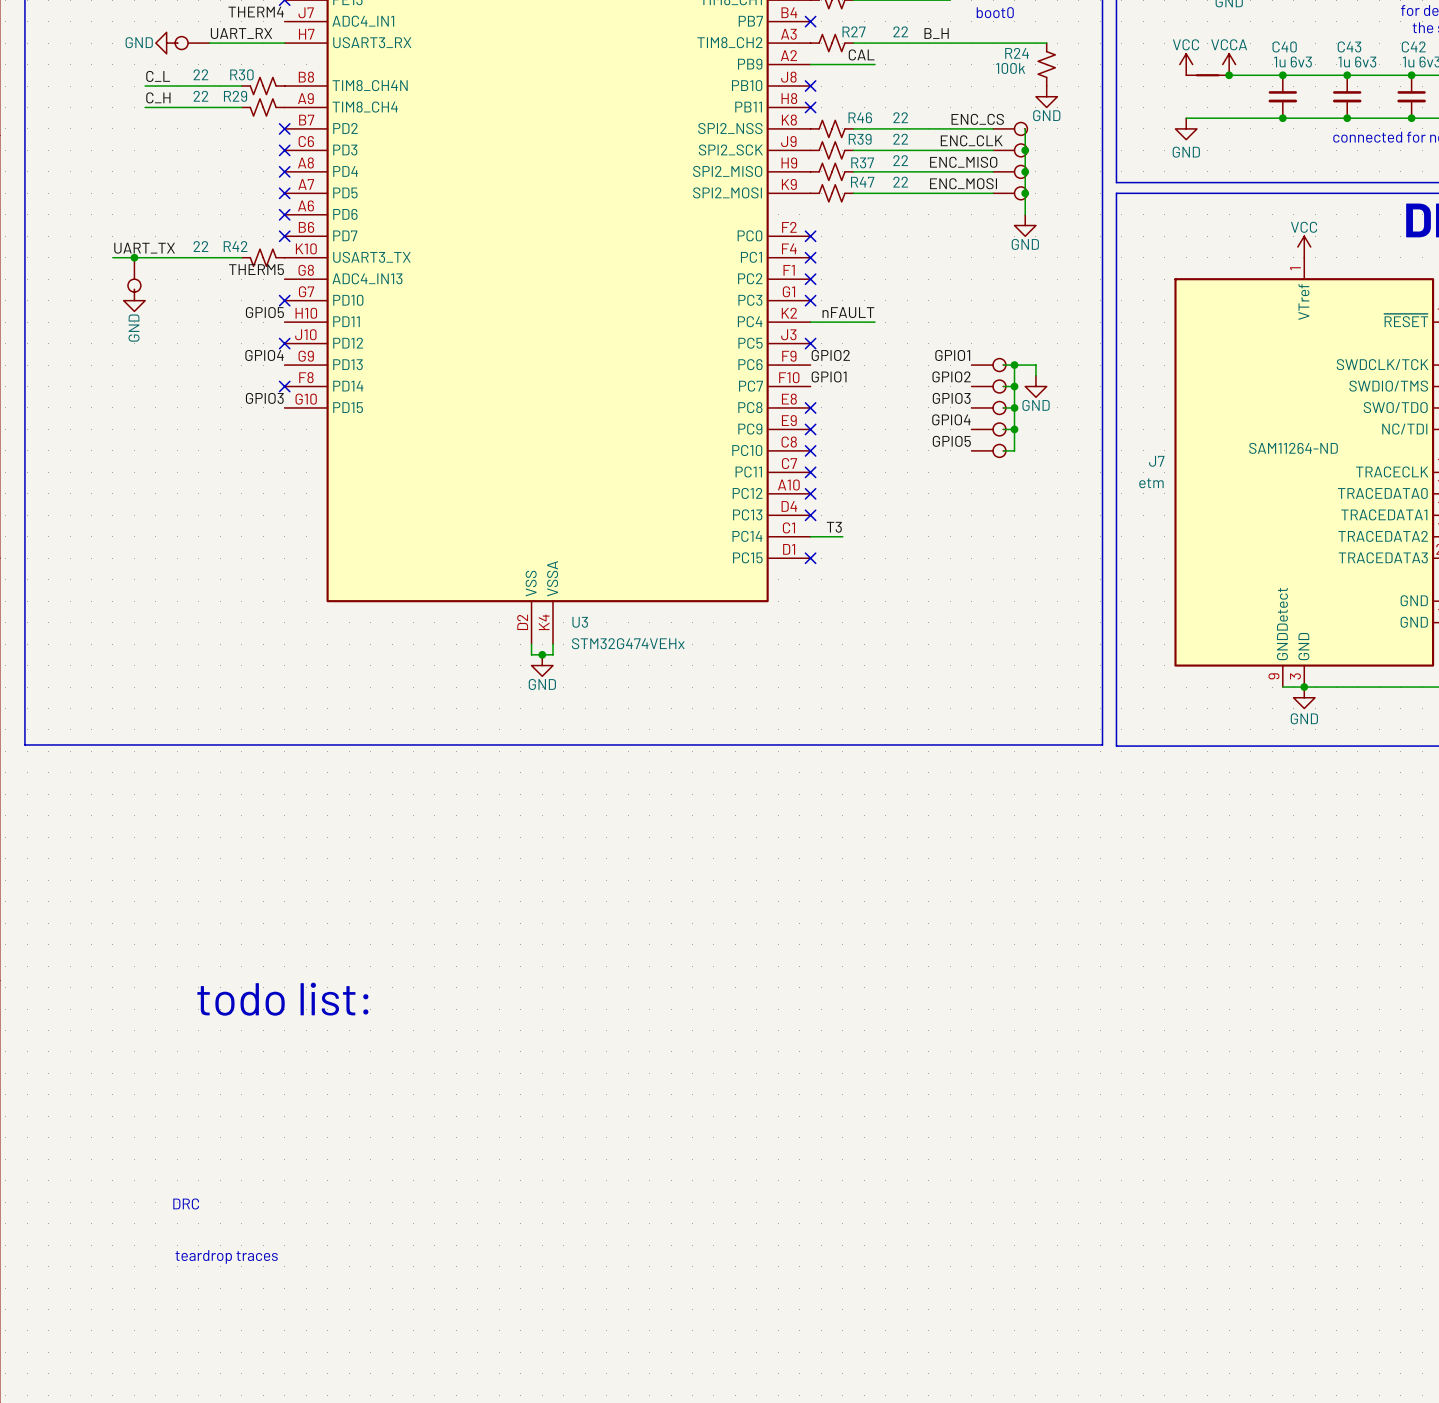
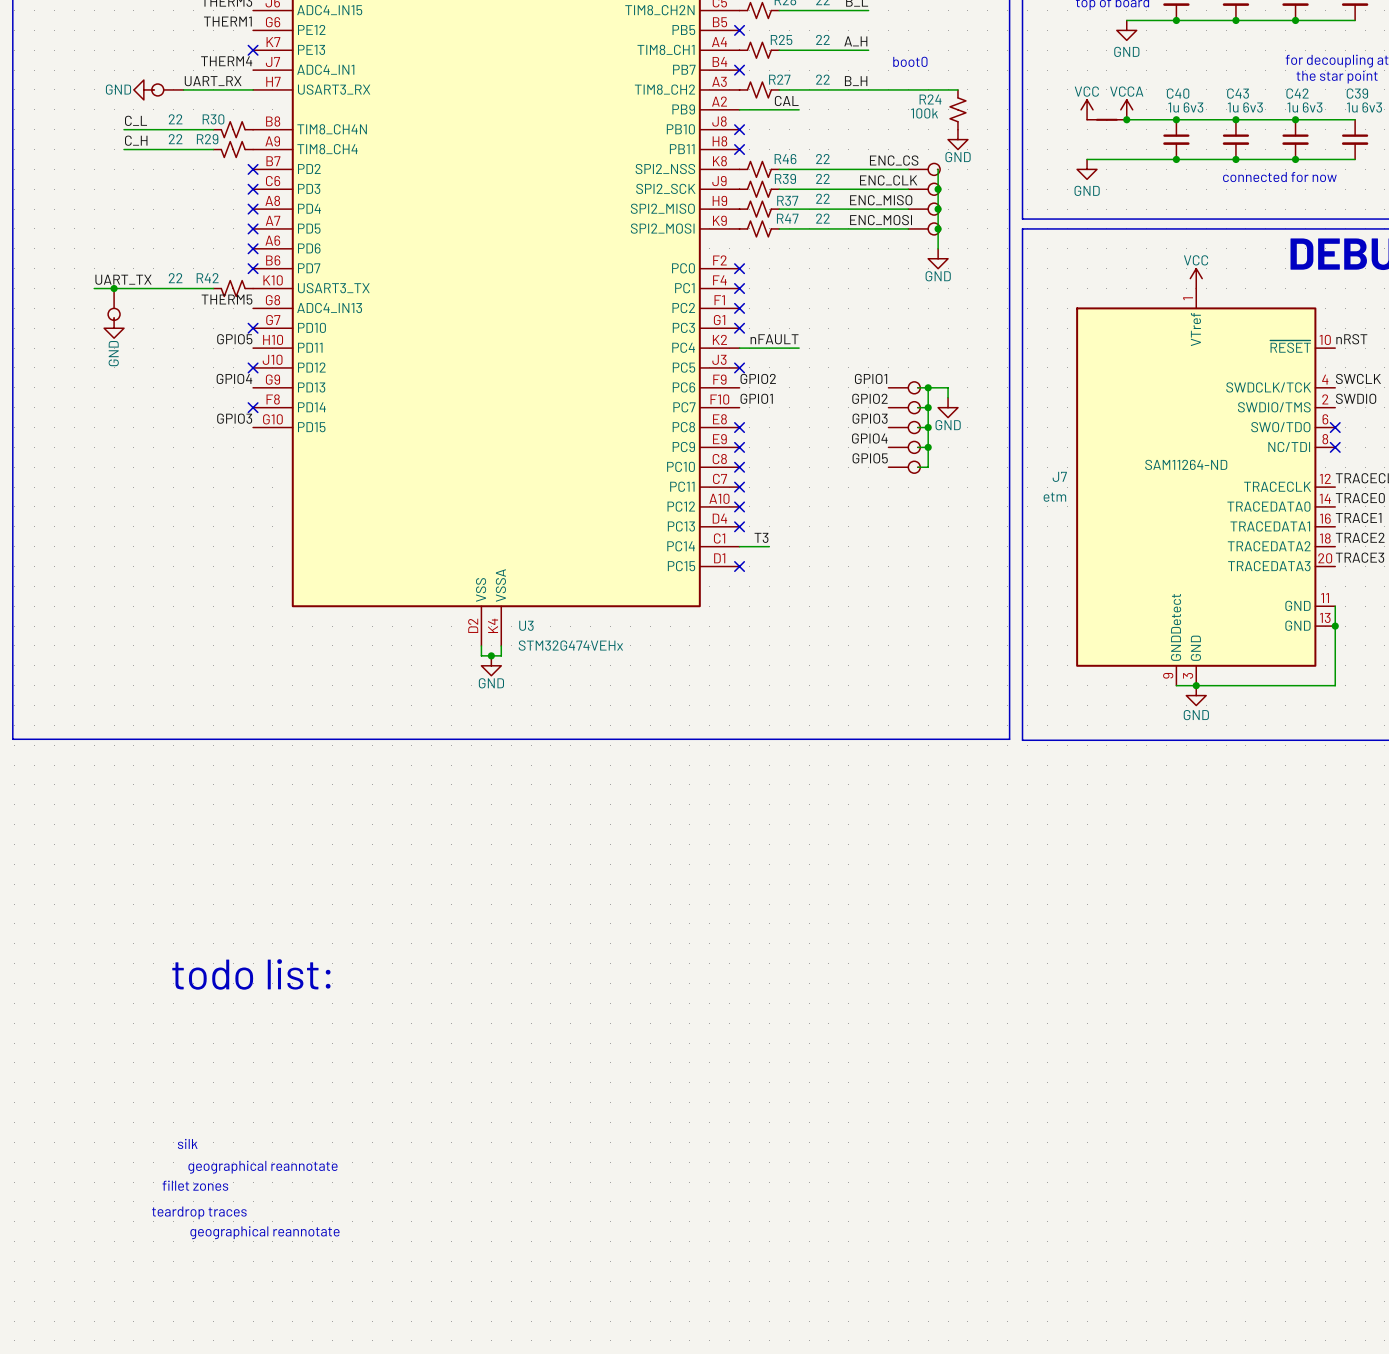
text: none -> silk (187, 1143)
text: DRC (186, 1203) -> none
text: none -> geographical reannotate (262, 1167)
text: none -> fillet zones (195, 1185)
text: none -> geographical reannotate (264, 1232)

